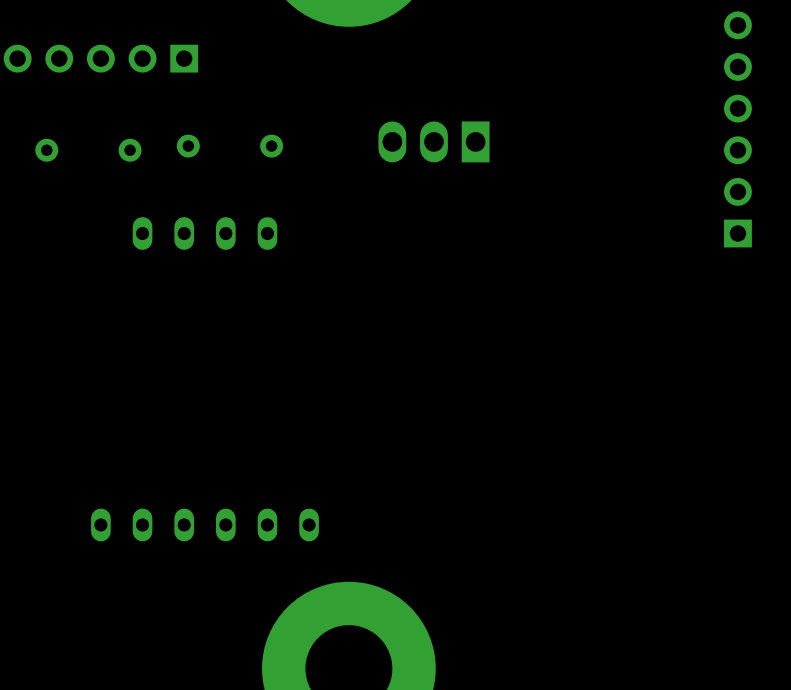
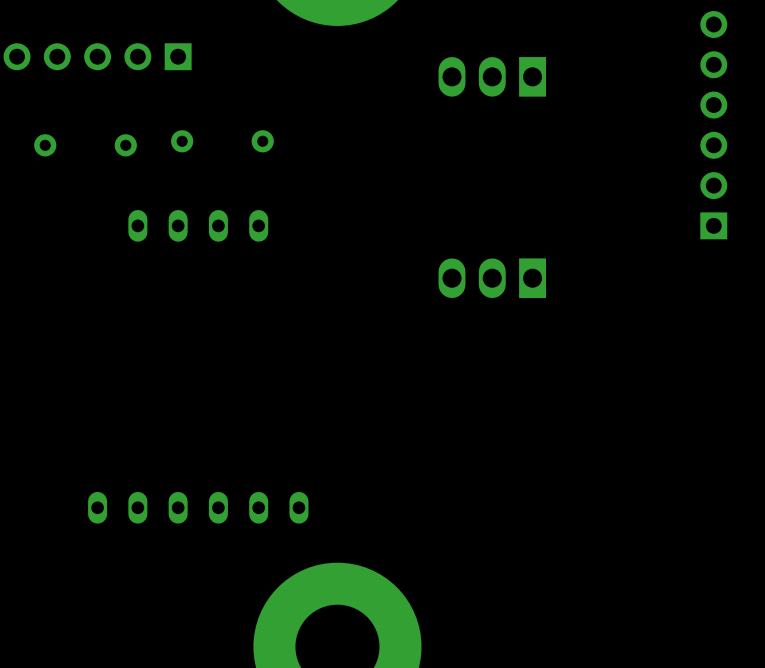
part: none -> (492, 76)
part: (434, 141) -> none
part: none -> (492, 278)

